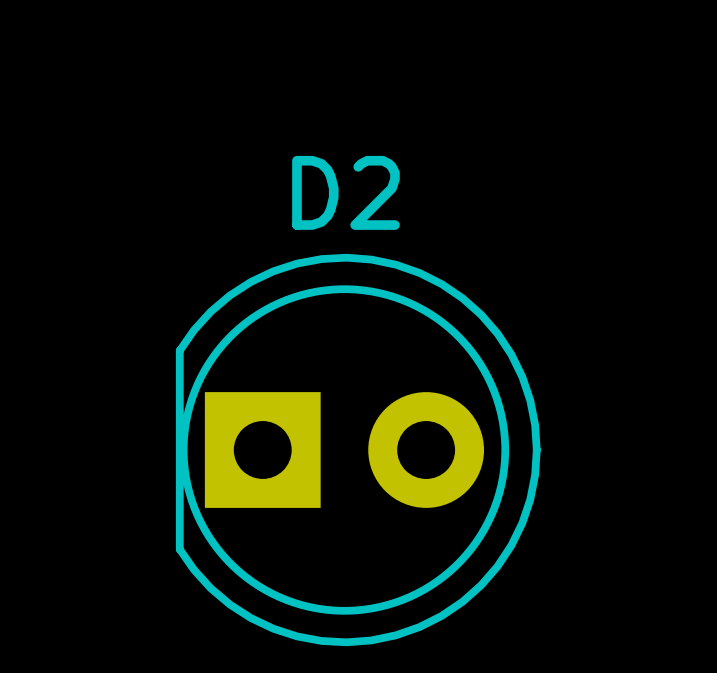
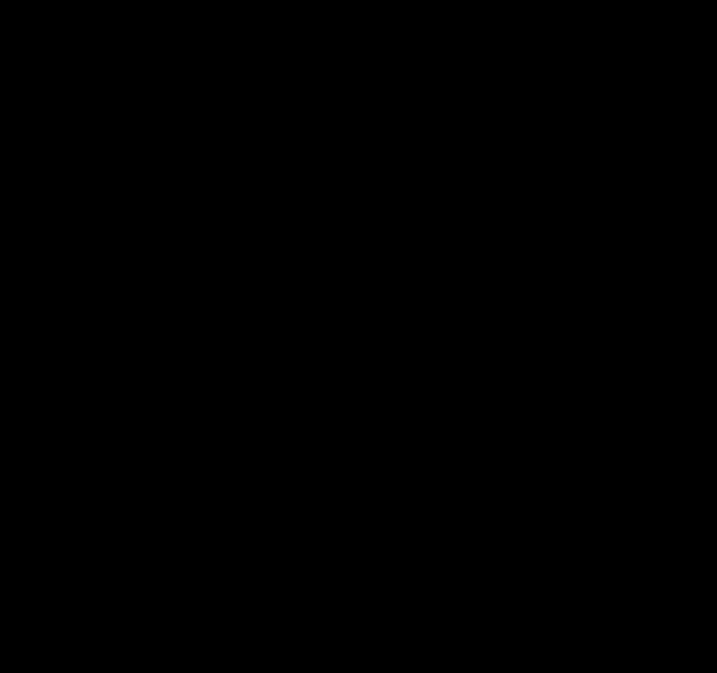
D2: (358, 450) -> none

